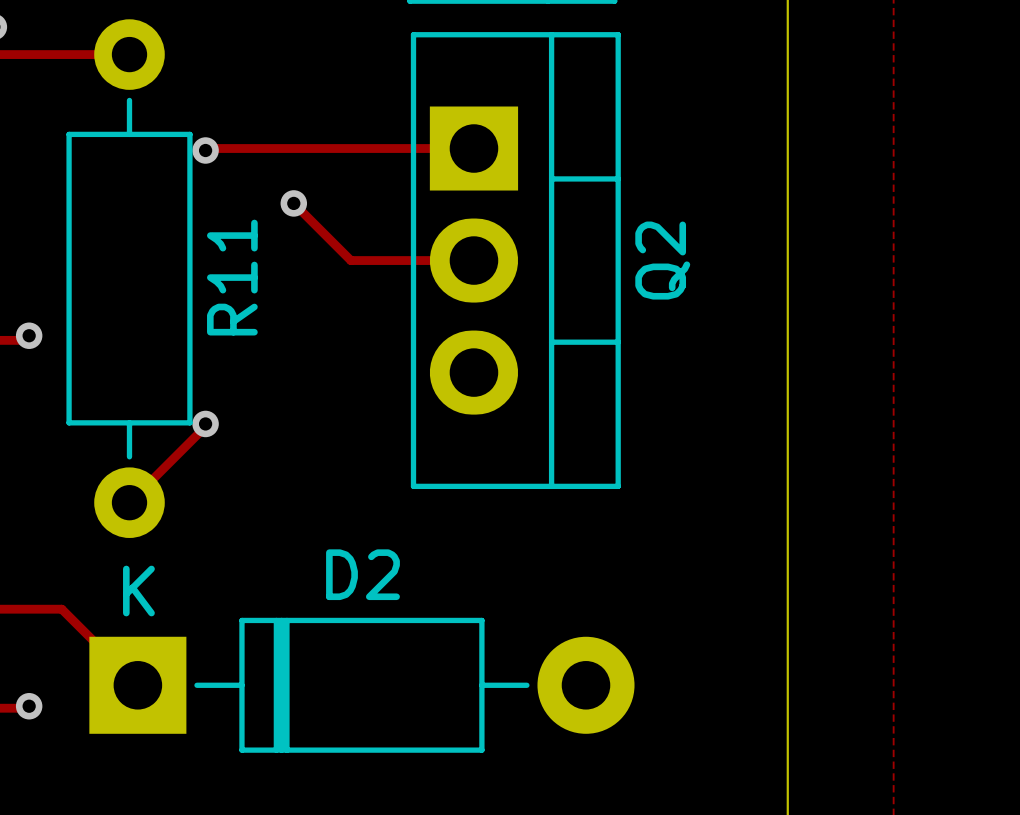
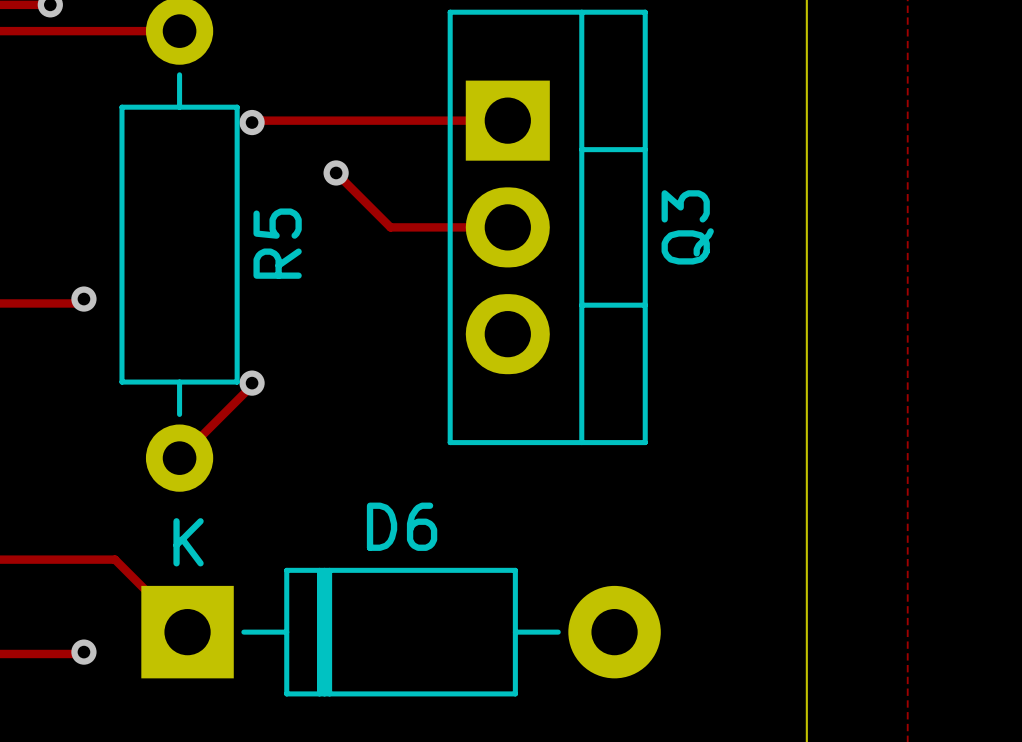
Q2 name: Q2 (662, 260) -> Q3 (687, 227)
R11 name: R11 (232, 277) -> R5 (277, 243)
D2 name: D2 (362, 574) -> D6 (402, 526)

